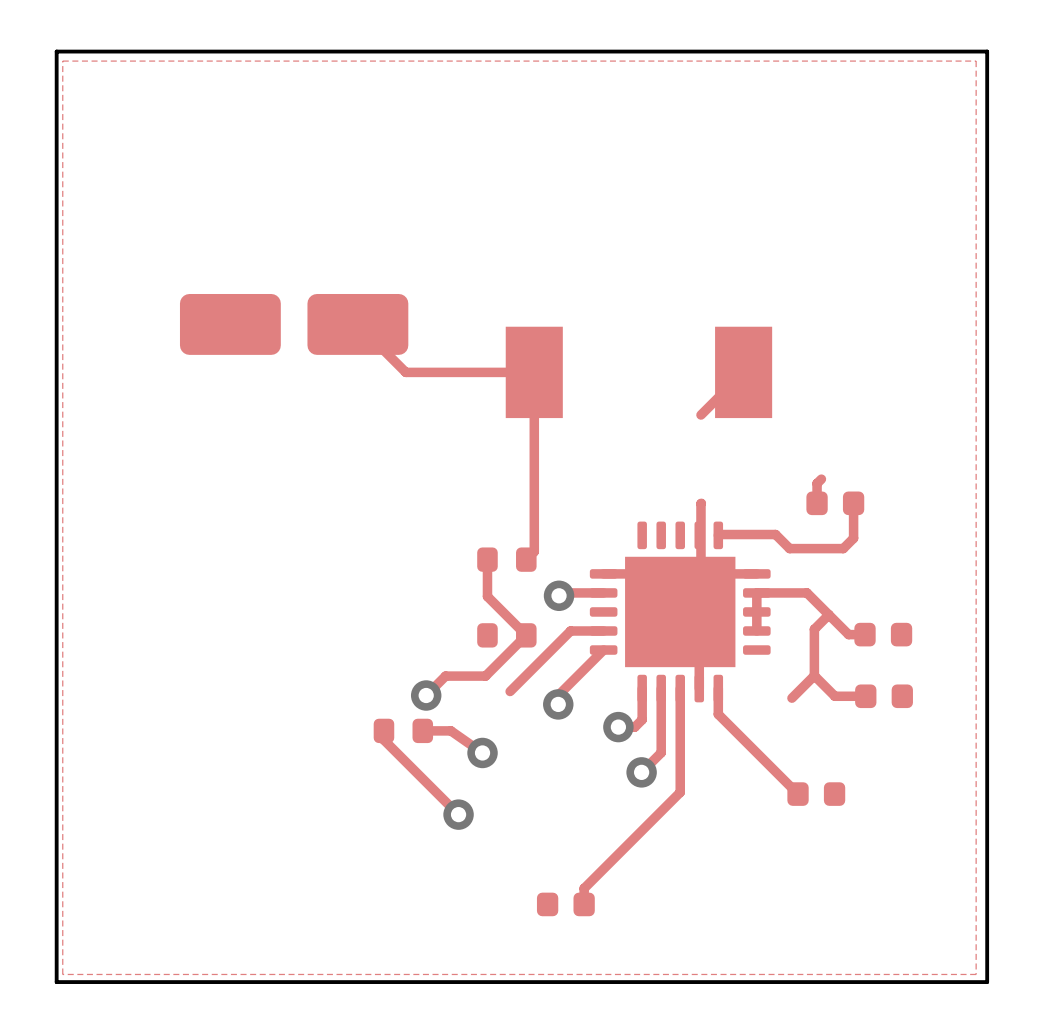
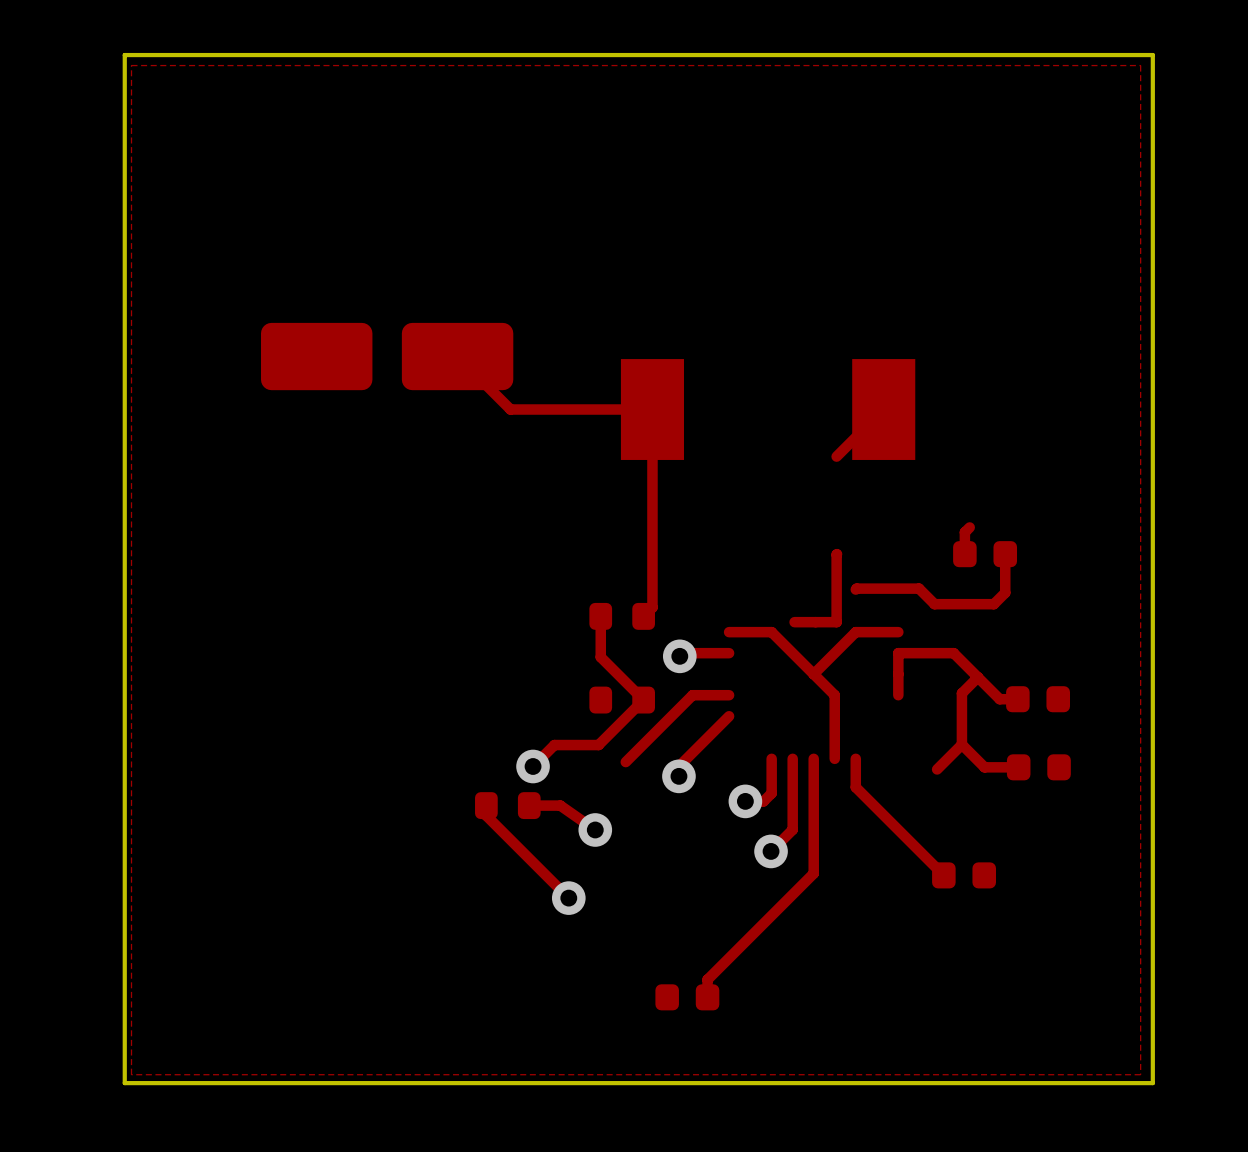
part: (680, 611) -> none

